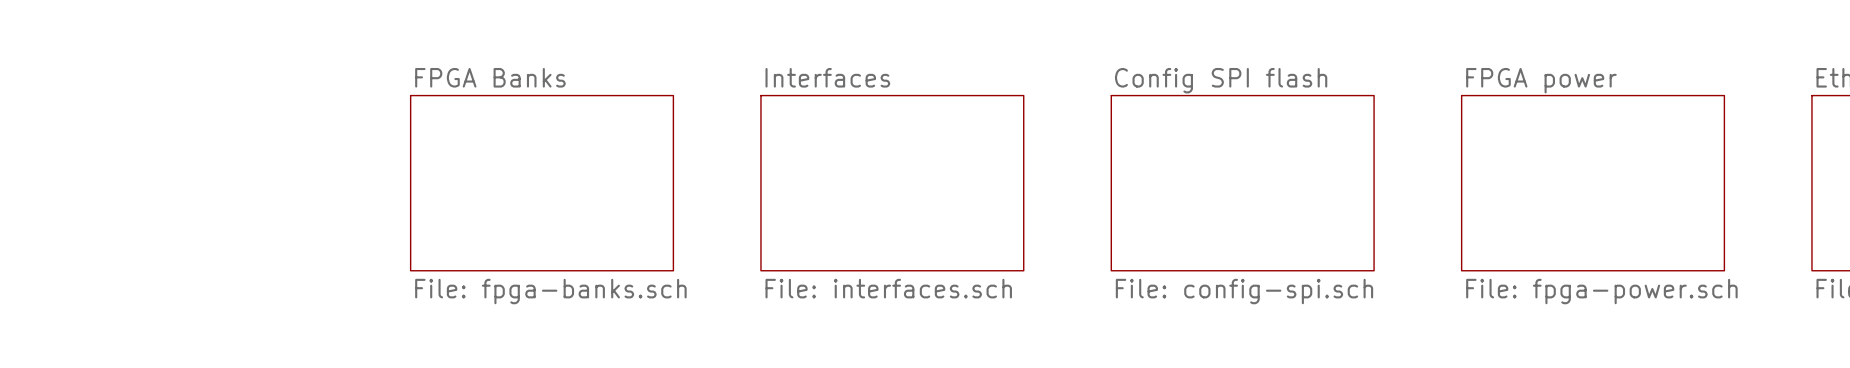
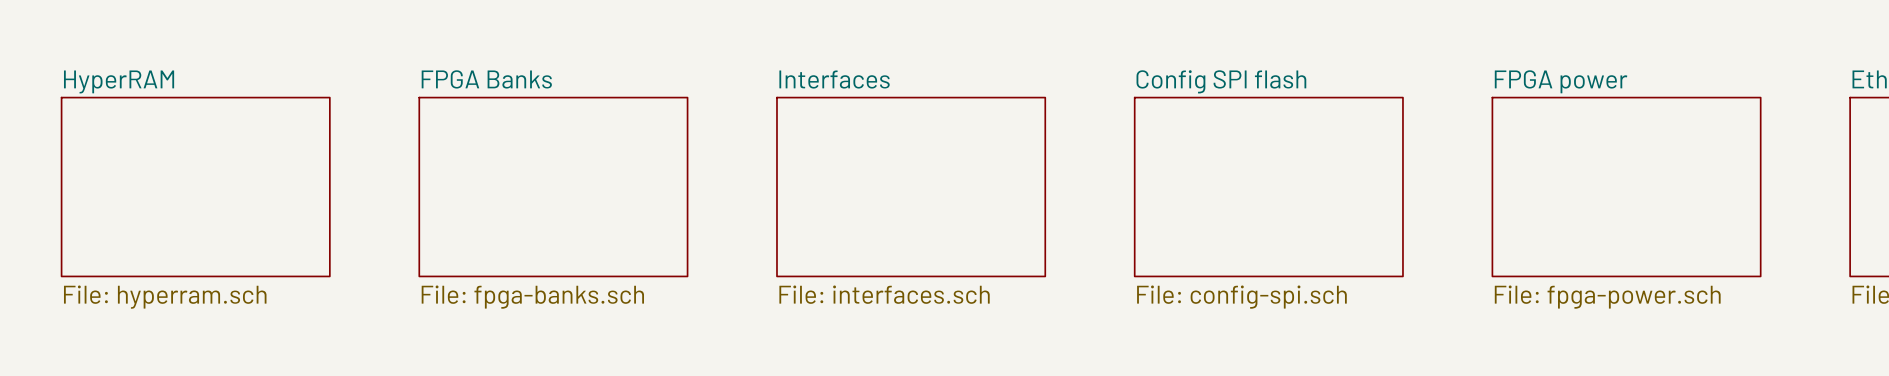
sheet HyperRAM: none -> File: hyperram.sch (195, 187)

